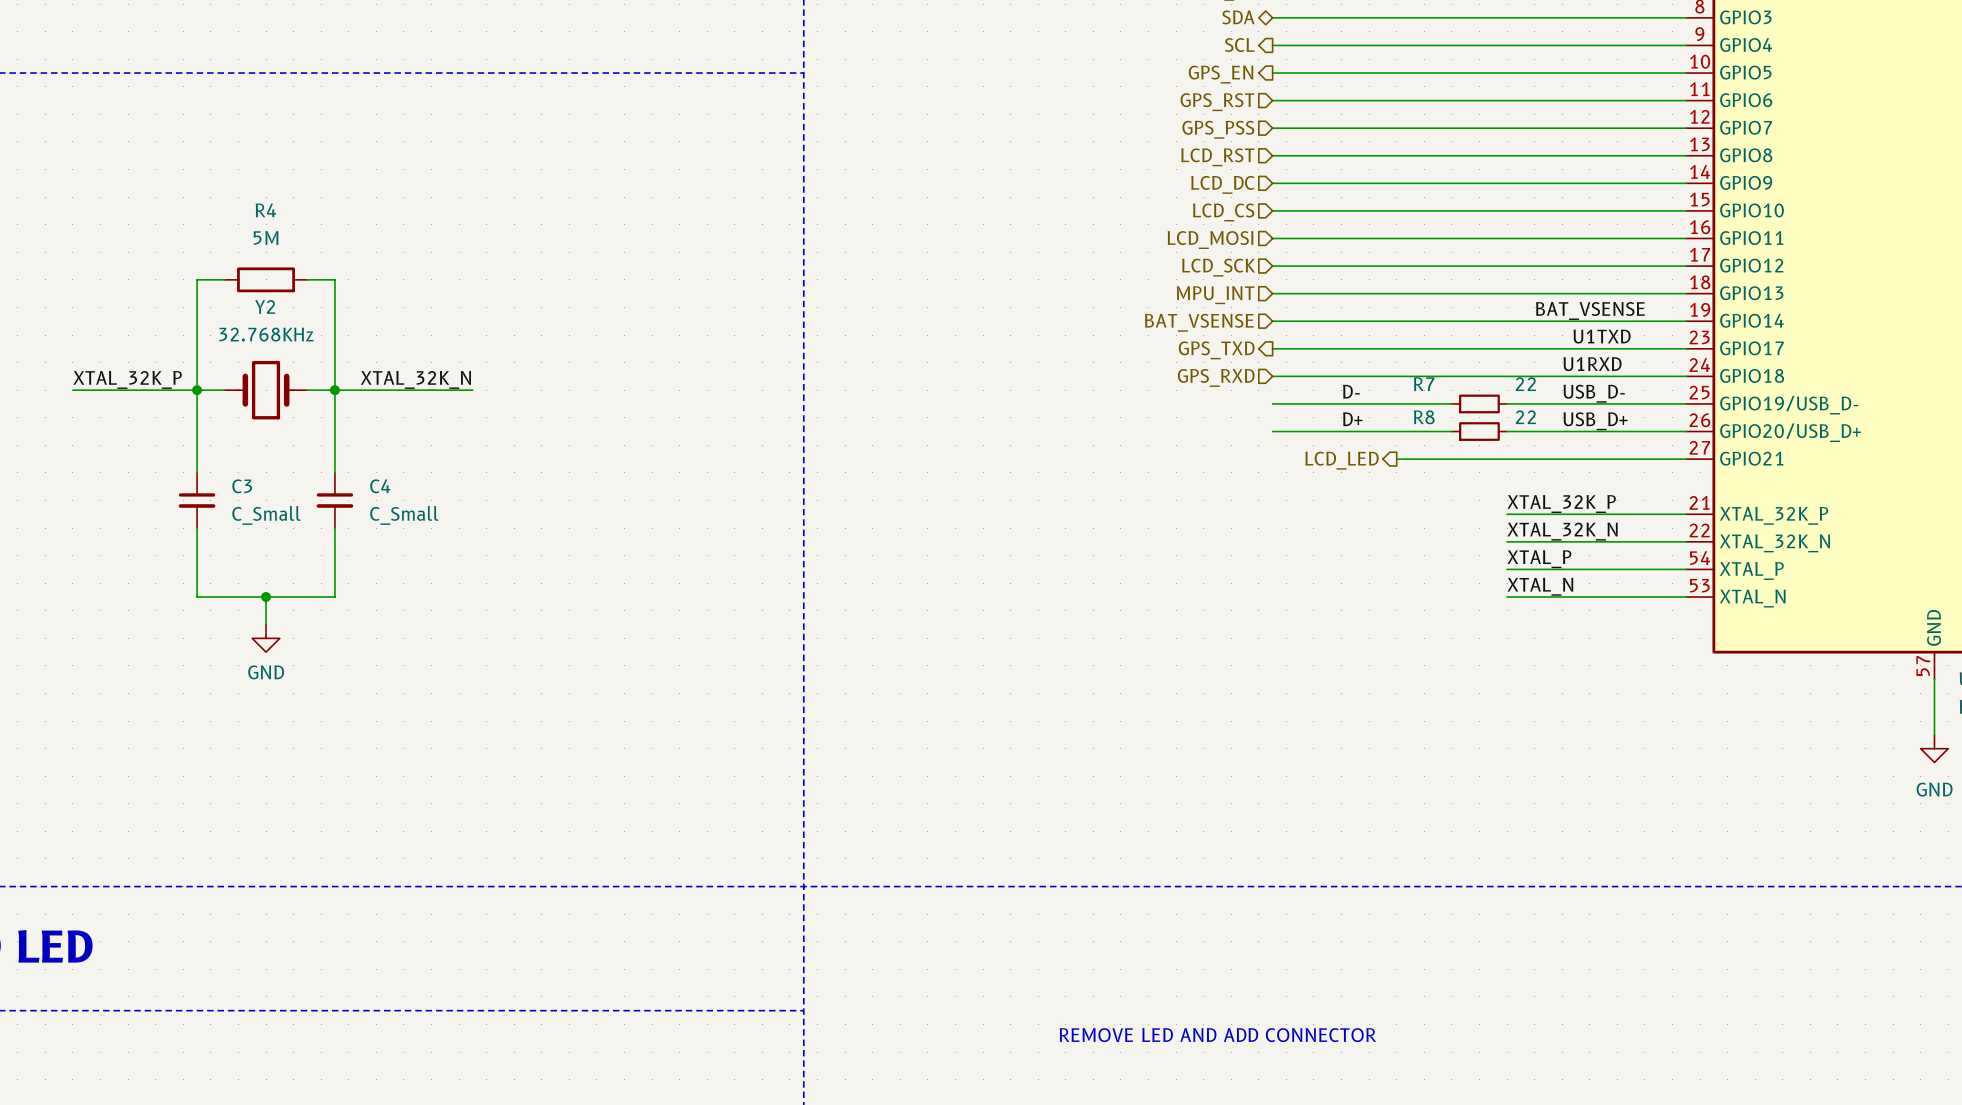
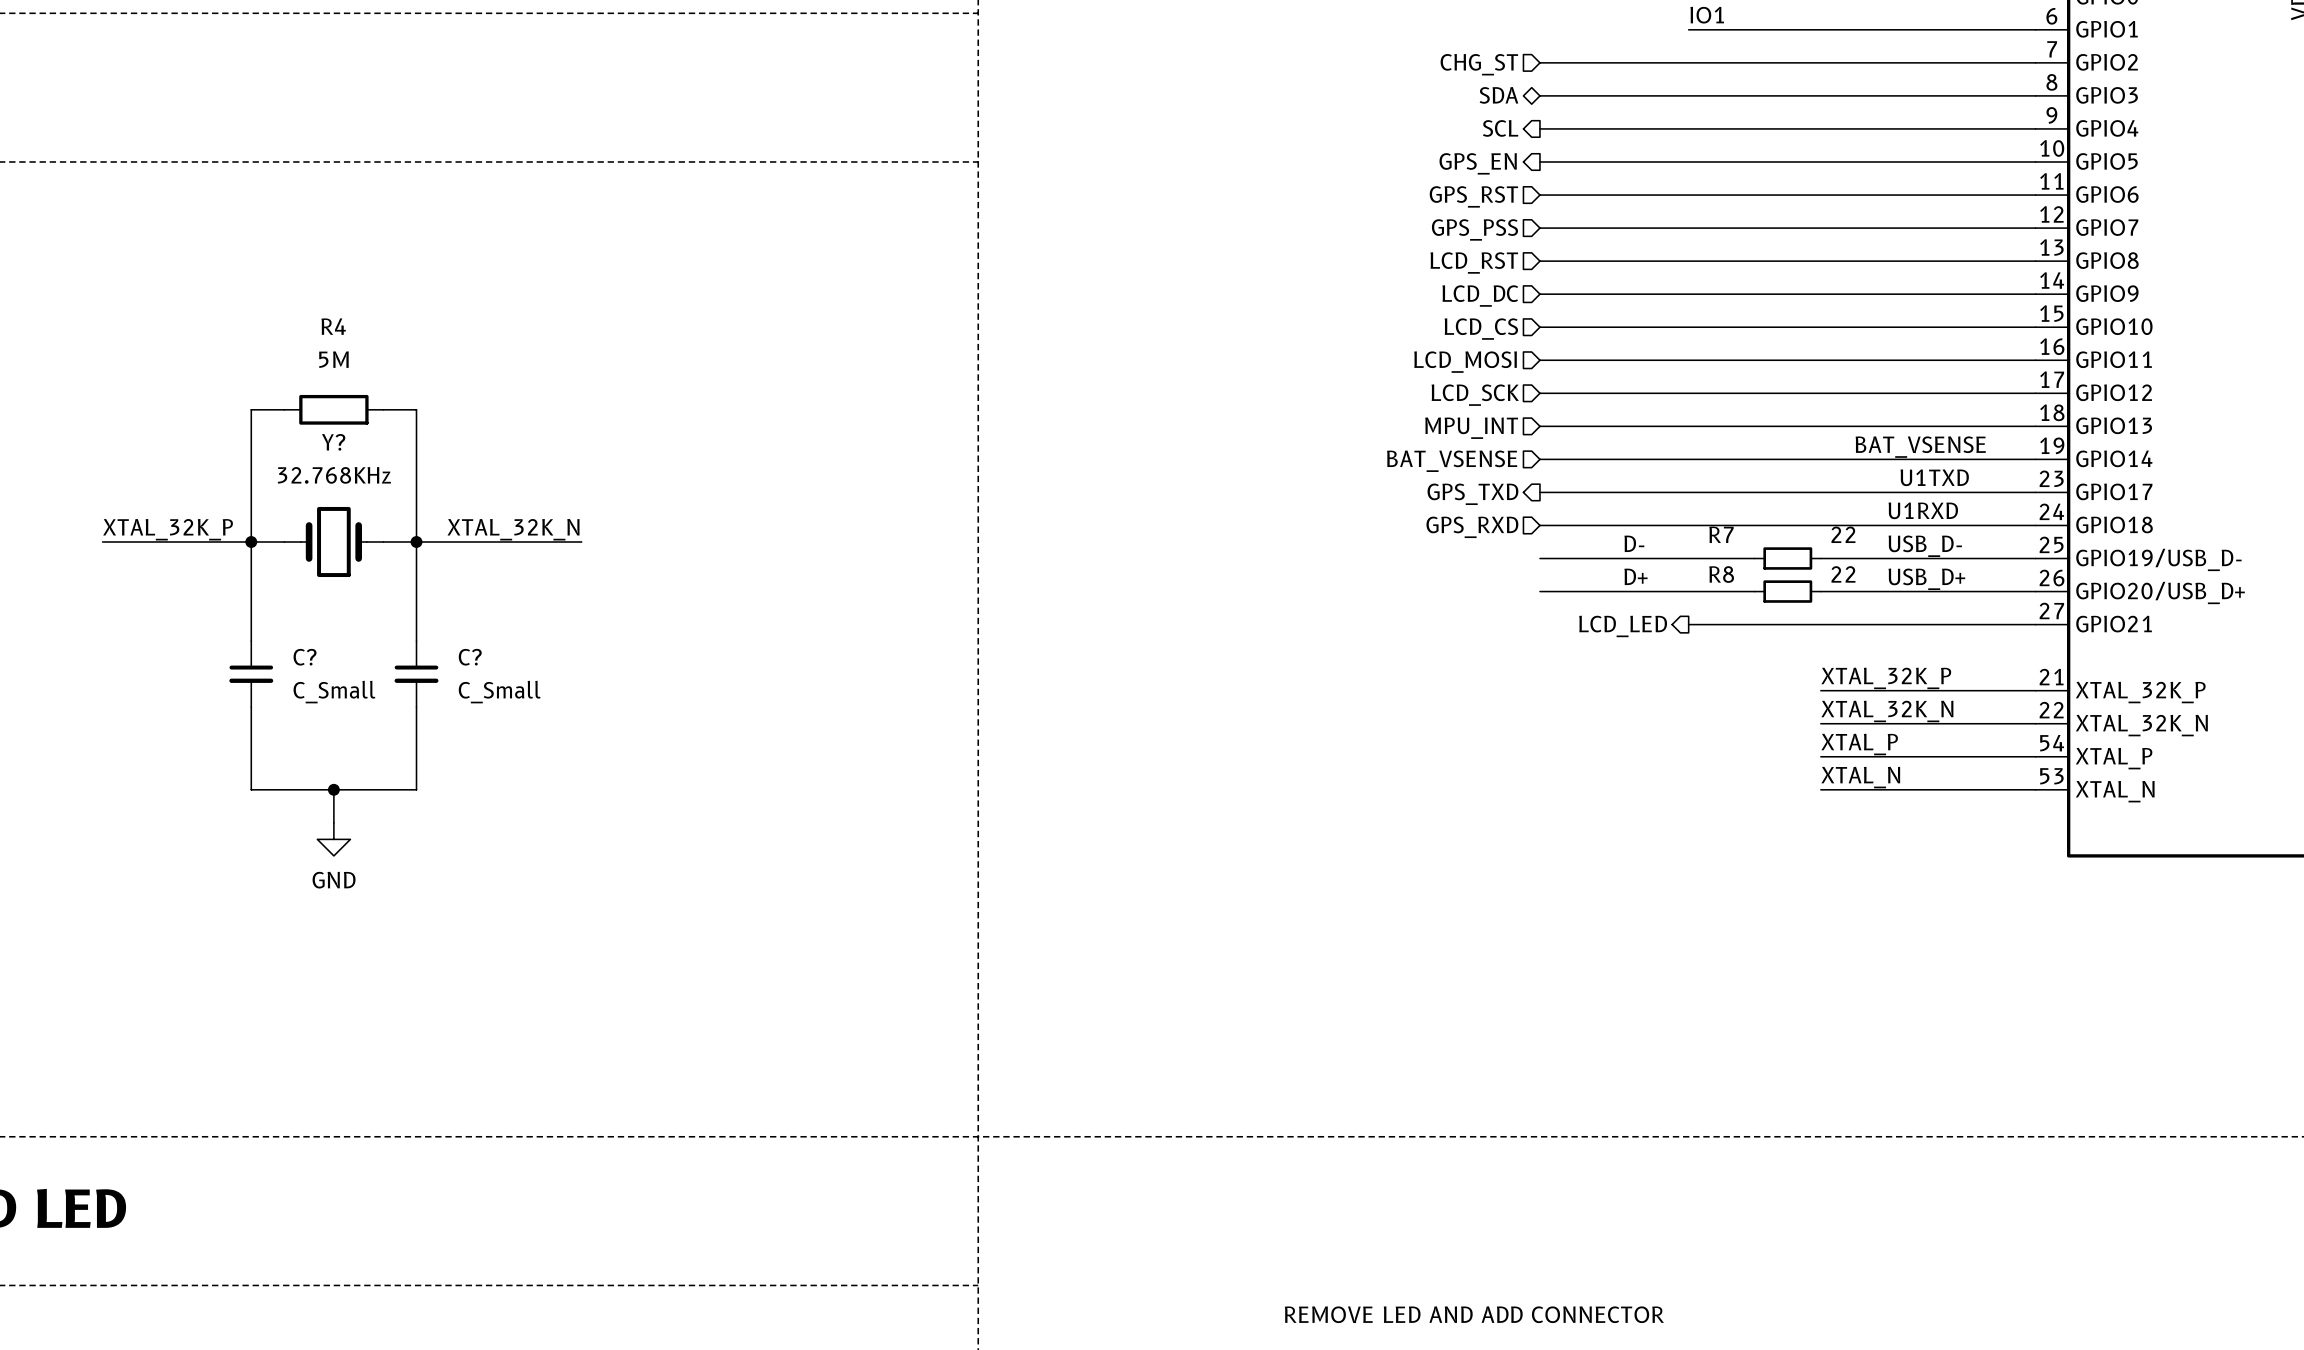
Y2 name: Y2 (265, 306) -> Y? (333, 442)
C3 name: C3 (242, 486) -> C? (305, 657)
C4 name: C4 (380, 486) -> C? (470, 657)

